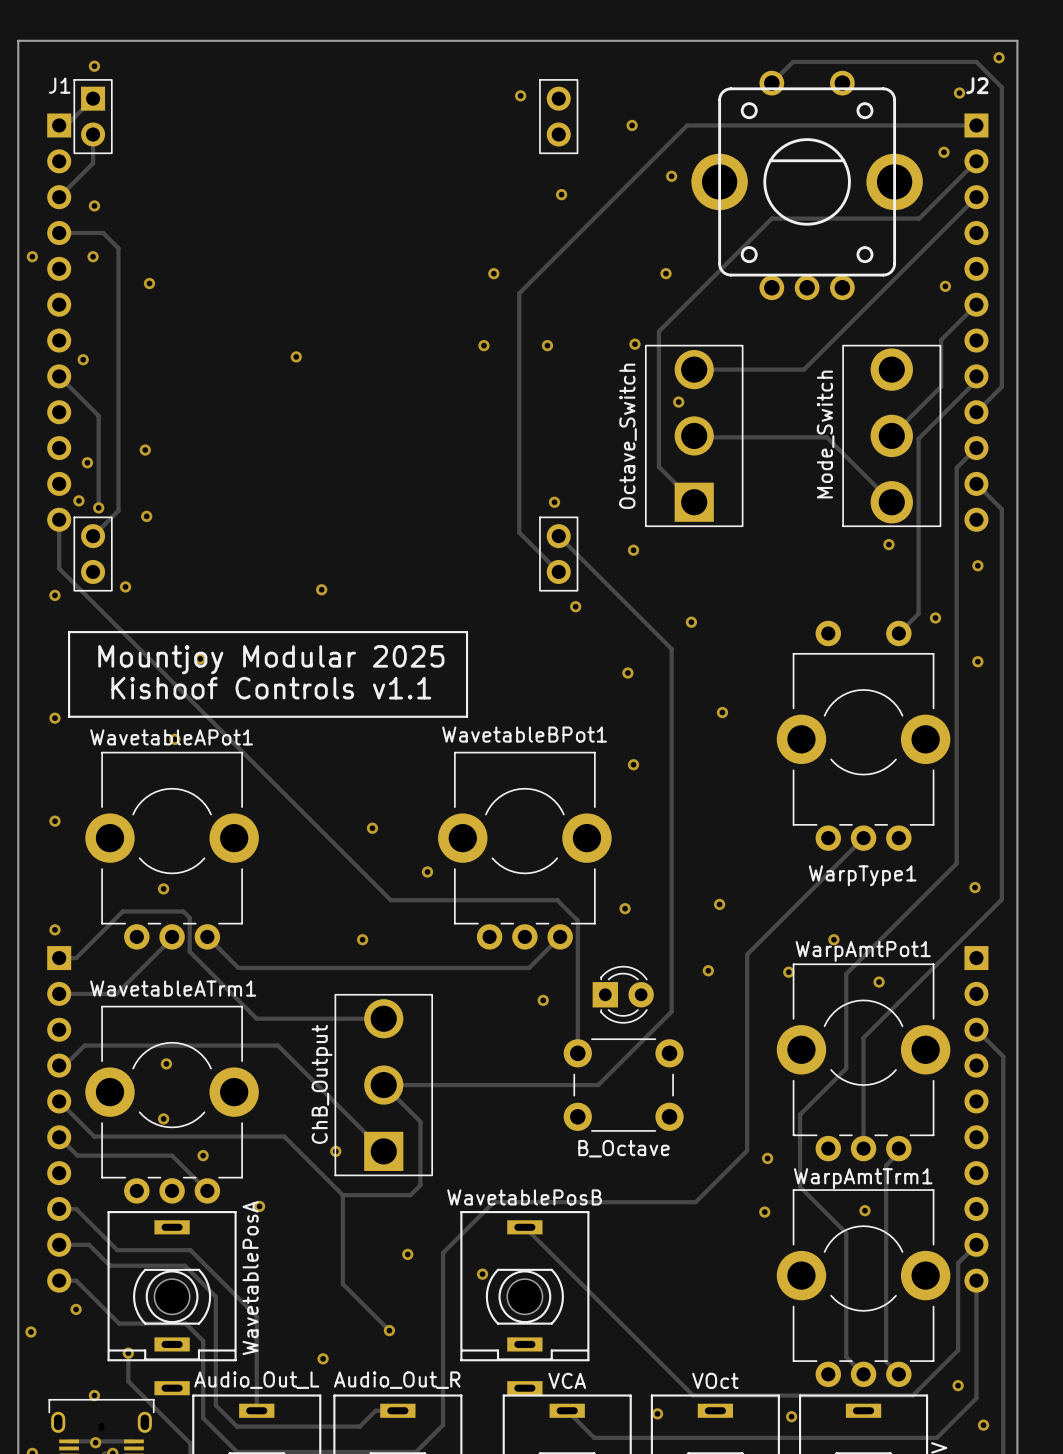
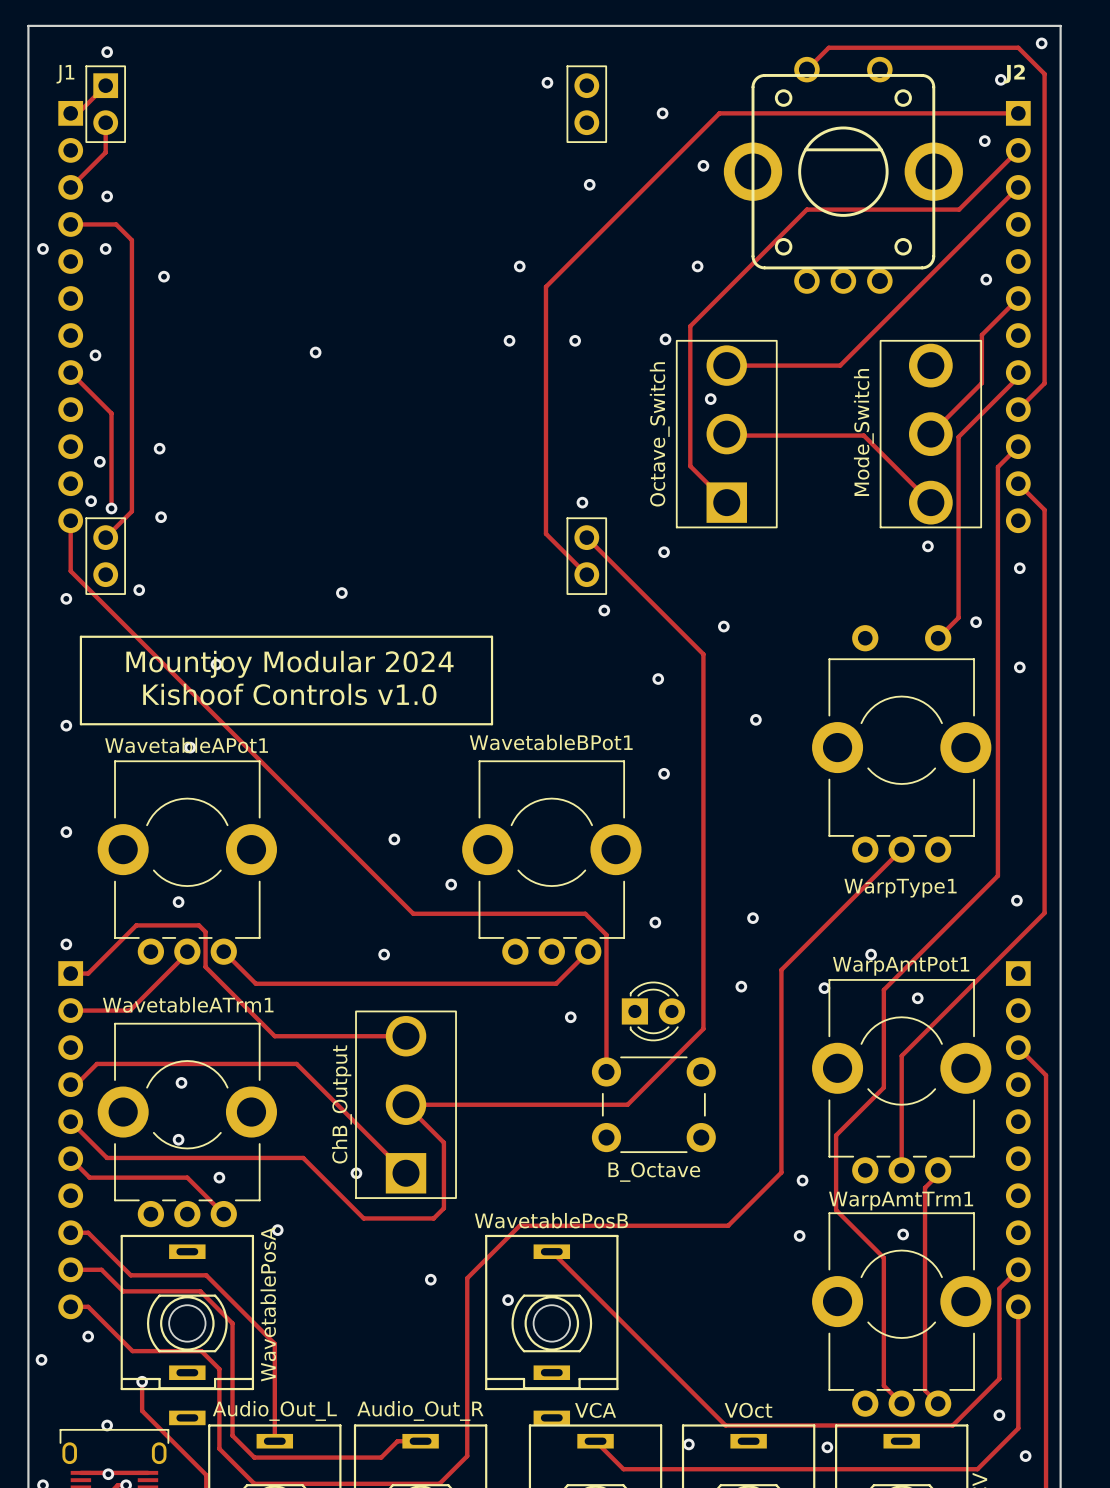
text: Mountjoy Modular 2025 (271, 659) -> Mountjoy Modular 2024 (289, 664)
text: Kishoof Controls v1.1 (271, 688) -> Kishoof Controls v1.0 (289, 694)
track: (342, 1195) (342, 1284) (389, 1330) -> none
via: (389, 1330) -> none
via: (323, 1358) -> none

